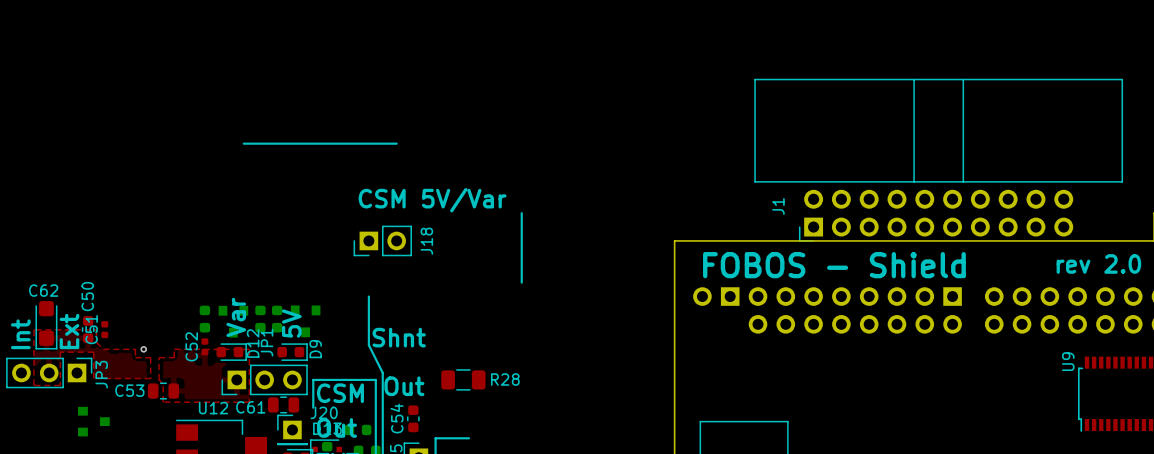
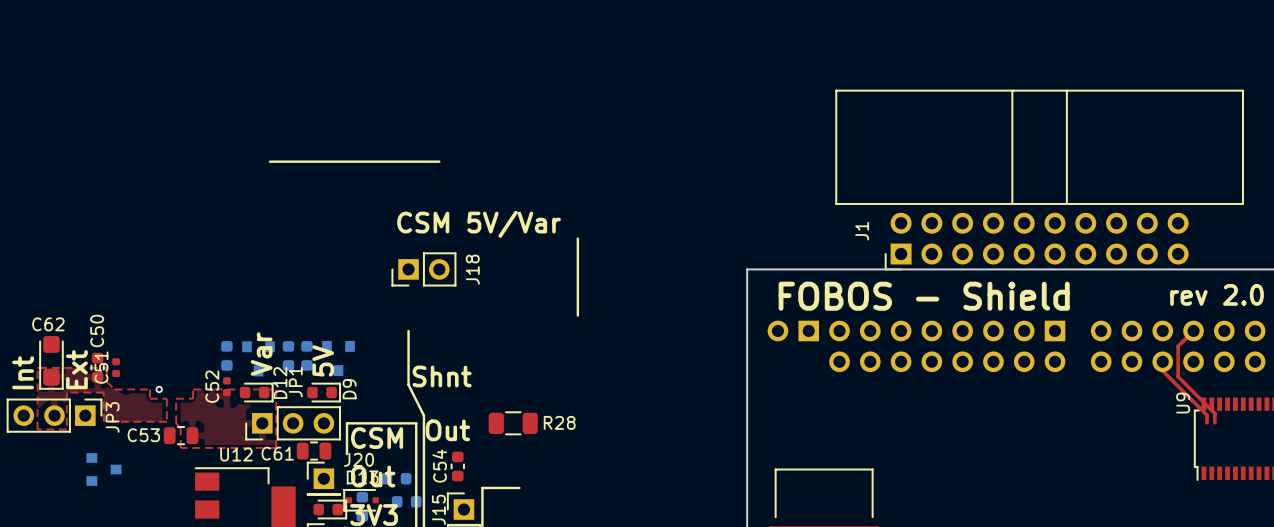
top track: none -> (1193, 330) (1178, 346) (1178, 376) (1214, 413) (1214, 422)
top track: none -> (1162, 361) (1162, 371) (1206, 415) (1206, 422)

